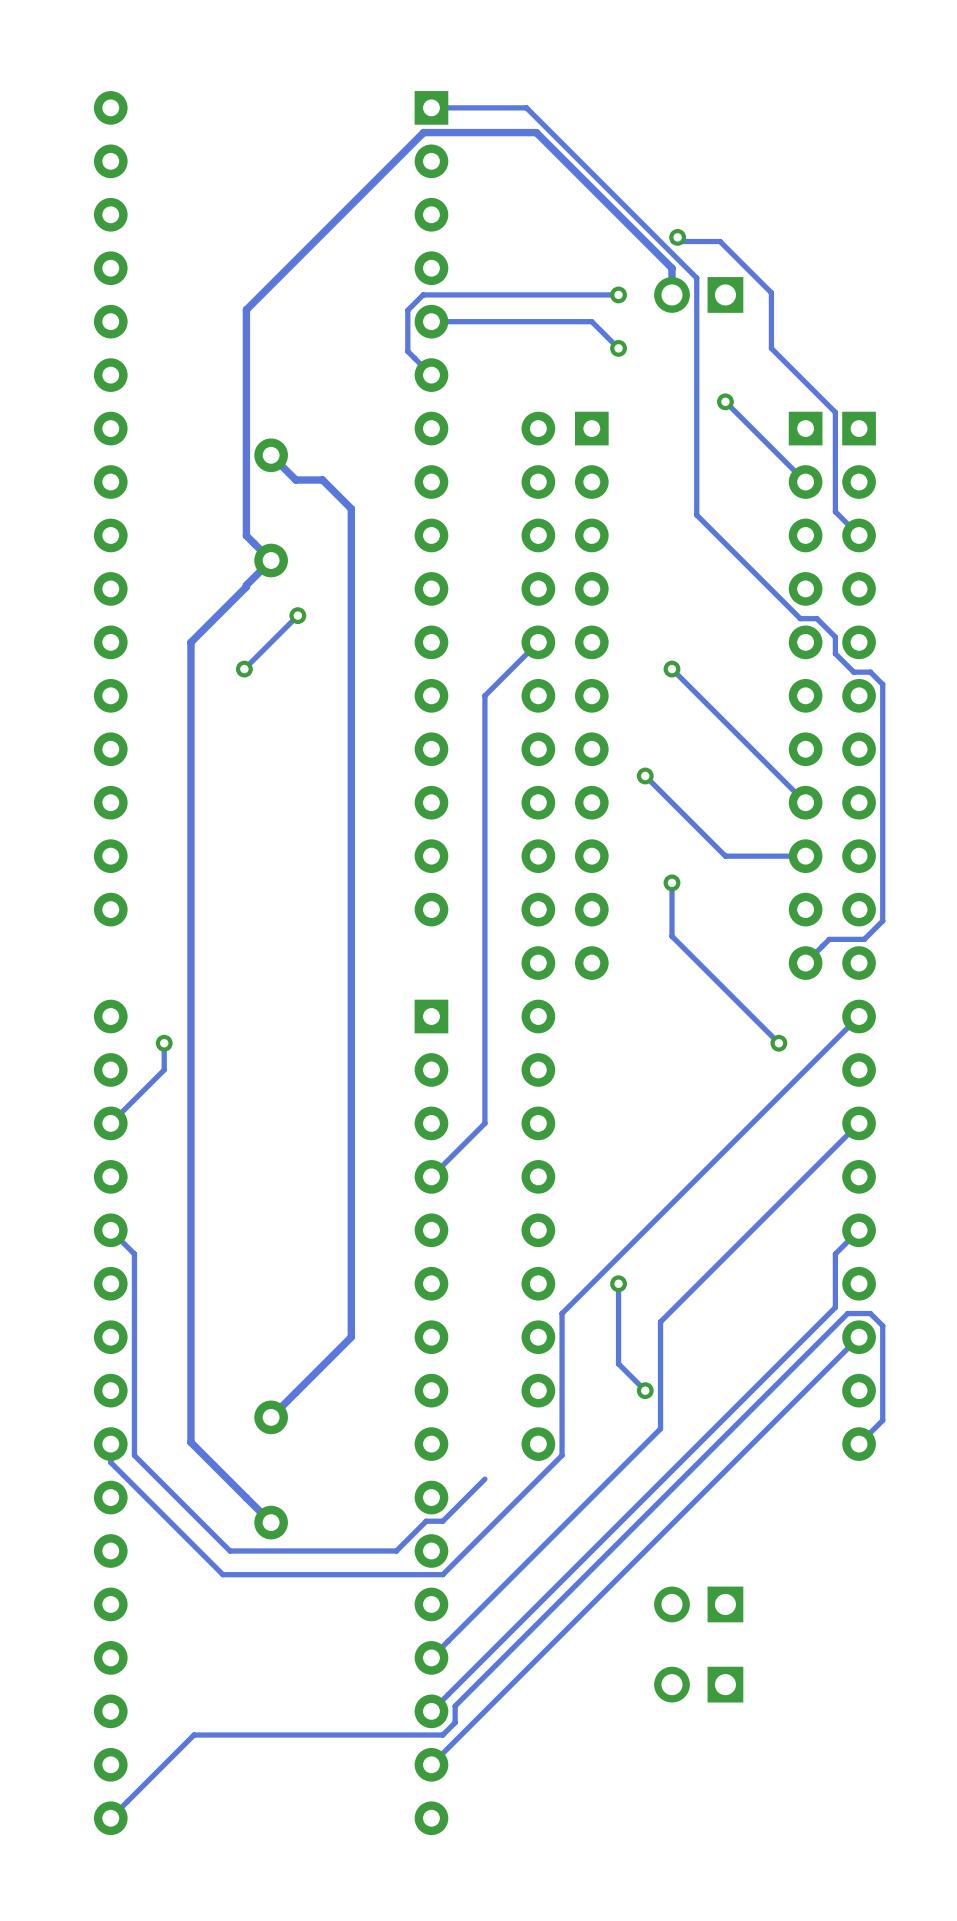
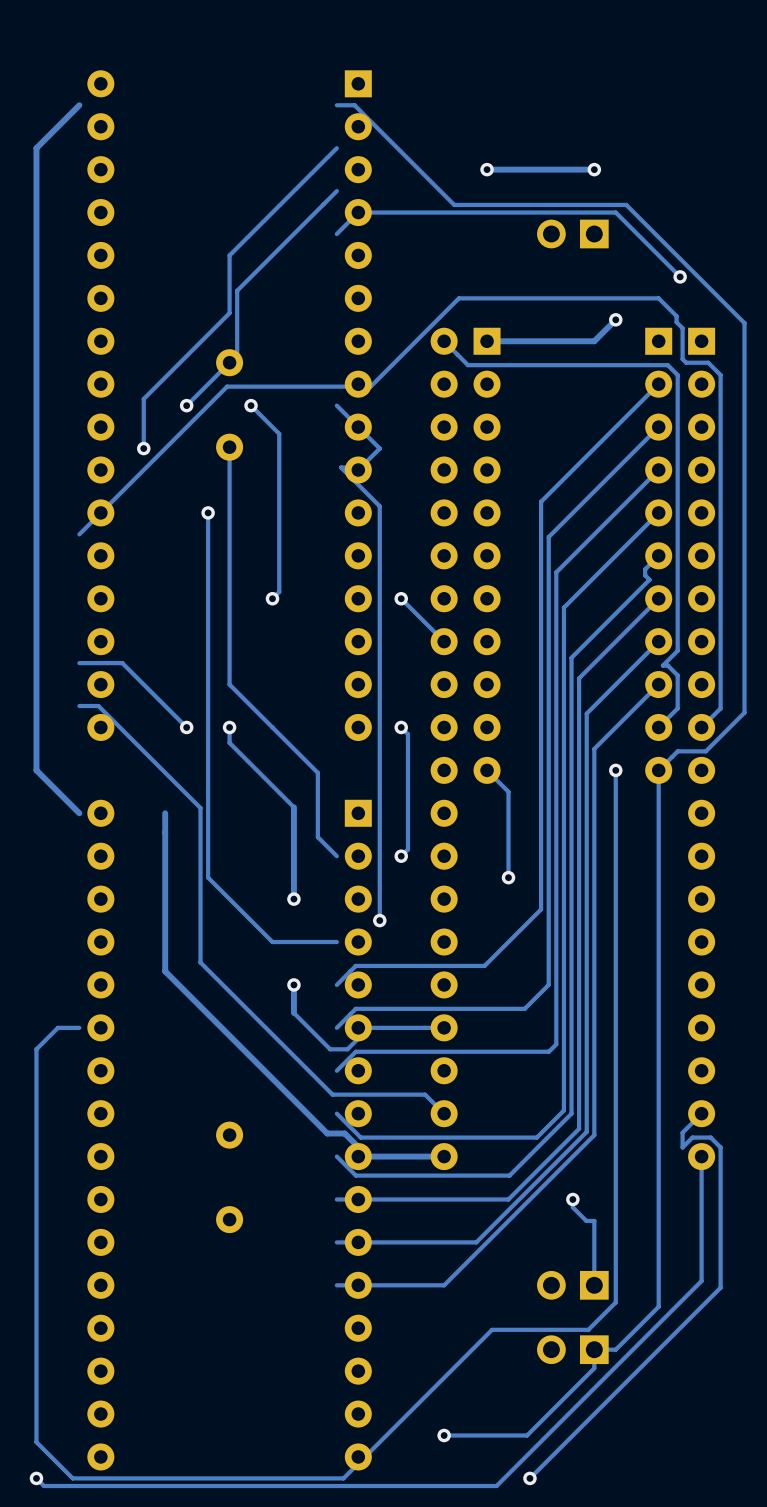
track: (431, 107) (526, 107) (696, 278) (696, 515) (800, 618) (816, 618) (835, 637) (835, 653) (853, 672) (870, 672) (882, 684) -> none
track: none -> (79, 105) (36, 148) (36, 770) (79, 813)
track: none -> (336, 105) (354, 105) (454, 204) (626, 204) (744, 323) (744, 712) (720, 736)
track: none -> (336, 148) (229, 255) (229, 313) (143, 398) (143, 448)
via: none -> (487, 169)
track: none -> (594, 169) (487, 169)
via: none -> (594, 169)
track: (677, 237) (673, 241) (720, 241) (771, 292) (771, 348) (827, 404) -> (79, 534) (227, 386) (370, 386) (458, 298) (658, 298) (676, 316) (676, 322)
via: (677, 237) -> none
track: none -> (336, 191) (237, 290) (237, 355) (186, 405)
track: none -> (336, 233) (358, 212) (615, 212) (680, 276)
track: (618, 294) (423, 294) (407, 310) (407, 351) (431, 375) -> none
via: (618, 294) -> none
track: (671, 294) (671, 268) (536, 132) (423, 132) (246, 309) (246, 535) (271, 560) (190, 642) (190, 1016) -> none
track: (431, 321) (591, 321) (618, 348) -> none
via: (618, 348) -> none
via: none -> (680, 276)
track: (725, 401) (805, 482) -> (336, 984) (355, 965) (484, 965) (541, 909) (541, 501) (658, 384)
via position: (725, 401) -> (615, 319)
track: none -> (615, 319) (594, 341) (487, 341)
track: none -> (444, 341) (468, 365) (667, 365) (677, 375) (677, 650) (662, 665) (667, 665) (677, 675) (677, 708) (658, 727)
track: (835, 450) (835, 511) (859, 535) -> (682, 359) (686, 362) (708, 362) (720, 375) (720, 546)
track: (271, 455) (295, 480) (322, 480) (351, 508) (351, 1009) -> (229, 727) (229, 742) (293, 807)
via: none -> (186, 405)
track: none -> (251, 405) (279, 433) (279, 591) (272, 598)
via: none -> (251, 405)
track: none -> (336, 405) (379, 448) (360, 467) (341, 467) (379, 506) (379, 920)
track: none -> (658, 427) (548, 537) (548, 984) (524, 1008) (355, 1008) (336, 1027)
via: none -> (143, 448)
track: none -> (229, 448) (229, 684) (317, 772) (317, 837) (336, 856)
track: (297, 615) (244, 669) -> none
via: (297, 615) -> none
track: none -> (208, 512) (208, 877) (272, 942) (336, 942)
track: (538, 642) (484, 695) (484, 1123) (431, 1176) -> none
track: none -> (658, 512) (563, 607) (563, 1110) (536, 1137) (360, 1137) (336, 1113)
via position: (244, 669) -> (208, 512)
track: (671, 669) (805, 802) -> (336, 1242) (476, 1242) (586, 1131) (586, 713) (658, 641)
via: (671, 669) -> none
track: none -> (658, 555) (645, 569) (645, 575) (649, 579) (571, 657) (571, 1113) (509, 1175) (355, 1175) (336, 1156)
via: none -> (272, 598)
track: none -> (401, 598) (444, 641)
via: none -> (401, 598)
track: none -> (658, 598) (579, 678) (579, 1128) (508, 1199) (336, 1199)
track: (645, 775) (725, 856) (805, 856) -> none
via: (645, 775) -> none
track: none -> (79, 663) (122, 663) (186, 727)
track: none -> (79, 706) (98, 706) (200, 808) (200, 962) (332, 1094) (425, 1094) (444, 1113)
track: (671, 882) (671, 936) (778, 1043) -> none
via: (671, 882) -> none
track: (882, 885) (882, 920) -> (720, 708) (701, 727)
via: none -> (186, 727)
via: none -> (229, 727)
track: none -> (401, 727) (407, 734) (407, 849) (401, 856)
via: none -> (401, 727)
track: none -> (487, 770) (508, 791) (508, 877)
track: none -> (615, 770) (615, 1302) (588, 1329) (492, 1329) (343, 1478) (72, 1478) (36, 1442) (36, 1049) (57, 1027) (79, 1027)
via: none -> (615, 770)
track: none -> (658, 770) (658, 1306) (615, 1349) (594, 1349) (594, 1368) (527, 1435) (444, 1435)
track: (859, 1016) (562, 1313) (562, 1455) (442, 1574) (222, 1574) (110, 1462) (110, 1444) -> none
track: (164, 1043) (164, 1069) (110, 1123) -> none
via: (164, 1043) -> none
via: (778, 1043) -> none
via: none -> (401, 856)
via: none -> (508, 877)
track: (351, 1123) (351, 1230) -> none
via: none -> (293, 899)
track: (859, 1123) (678, 1304) -> (658, 470) (556, 572) (556, 1044)
via: none -> (379, 920)
track: (190, 1213) (190, 1442) (271, 1522) -> (165, 971) (327, 1133) (344, 1133) (367, 1156) (444, 1156)
track: (110, 1230) (134, 1253) (134, 1455) (229, 1551) (396, 1551) (426, 1521) (442, 1521) (484, 1479) -> none
via: none -> (293, 984)
track: (859, 1230) (835, 1253) (835, 1307) (725, 1417) -> (658, 684) (594, 748) (594, 1135)
track: (351, 1265) (351, 1337) (271, 1417) -> (293, 1013) (330, 1049) (347, 1049) (369, 1027) (444, 1027)
track: (618, 1283) (618, 1363) (645, 1390) -> none
via: (618, 1283) -> none
track: (668, 1313) (660, 1321) (660, 1428) (431, 1657) -> (548, 1051) (355, 1051) (336, 1070)
track: (859, 1337) (431, 1764) -> none
via: (645, 1390) -> none
track: none -> (701, 1113) (682, 1132) (682, 1147) (692, 1137) (710, 1137) (720, 1147) (720, 1287) (529, 1478)
track: (859, 1444) (882, 1420) (882, 1325) (870, 1313) (847, 1313) (455, 1706) (455, 1722) (442, 1735) (194, 1735) (110, 1818) -> (701, 1156) (701, 1281) (496, 1486) (44, 1486) (36, 1478)
track: none -> (572, 1199) (572, 1207) (586, 1220) (594, 1220) (594, 1285)
via: none -> (572, 1199)
track: (538, 1604) (431, 1711) -> (444, 1285) (336, 1285)
via: none -> (444, 1435)
via: none -> (36, 1478)
via: none -> (529, 1478)

